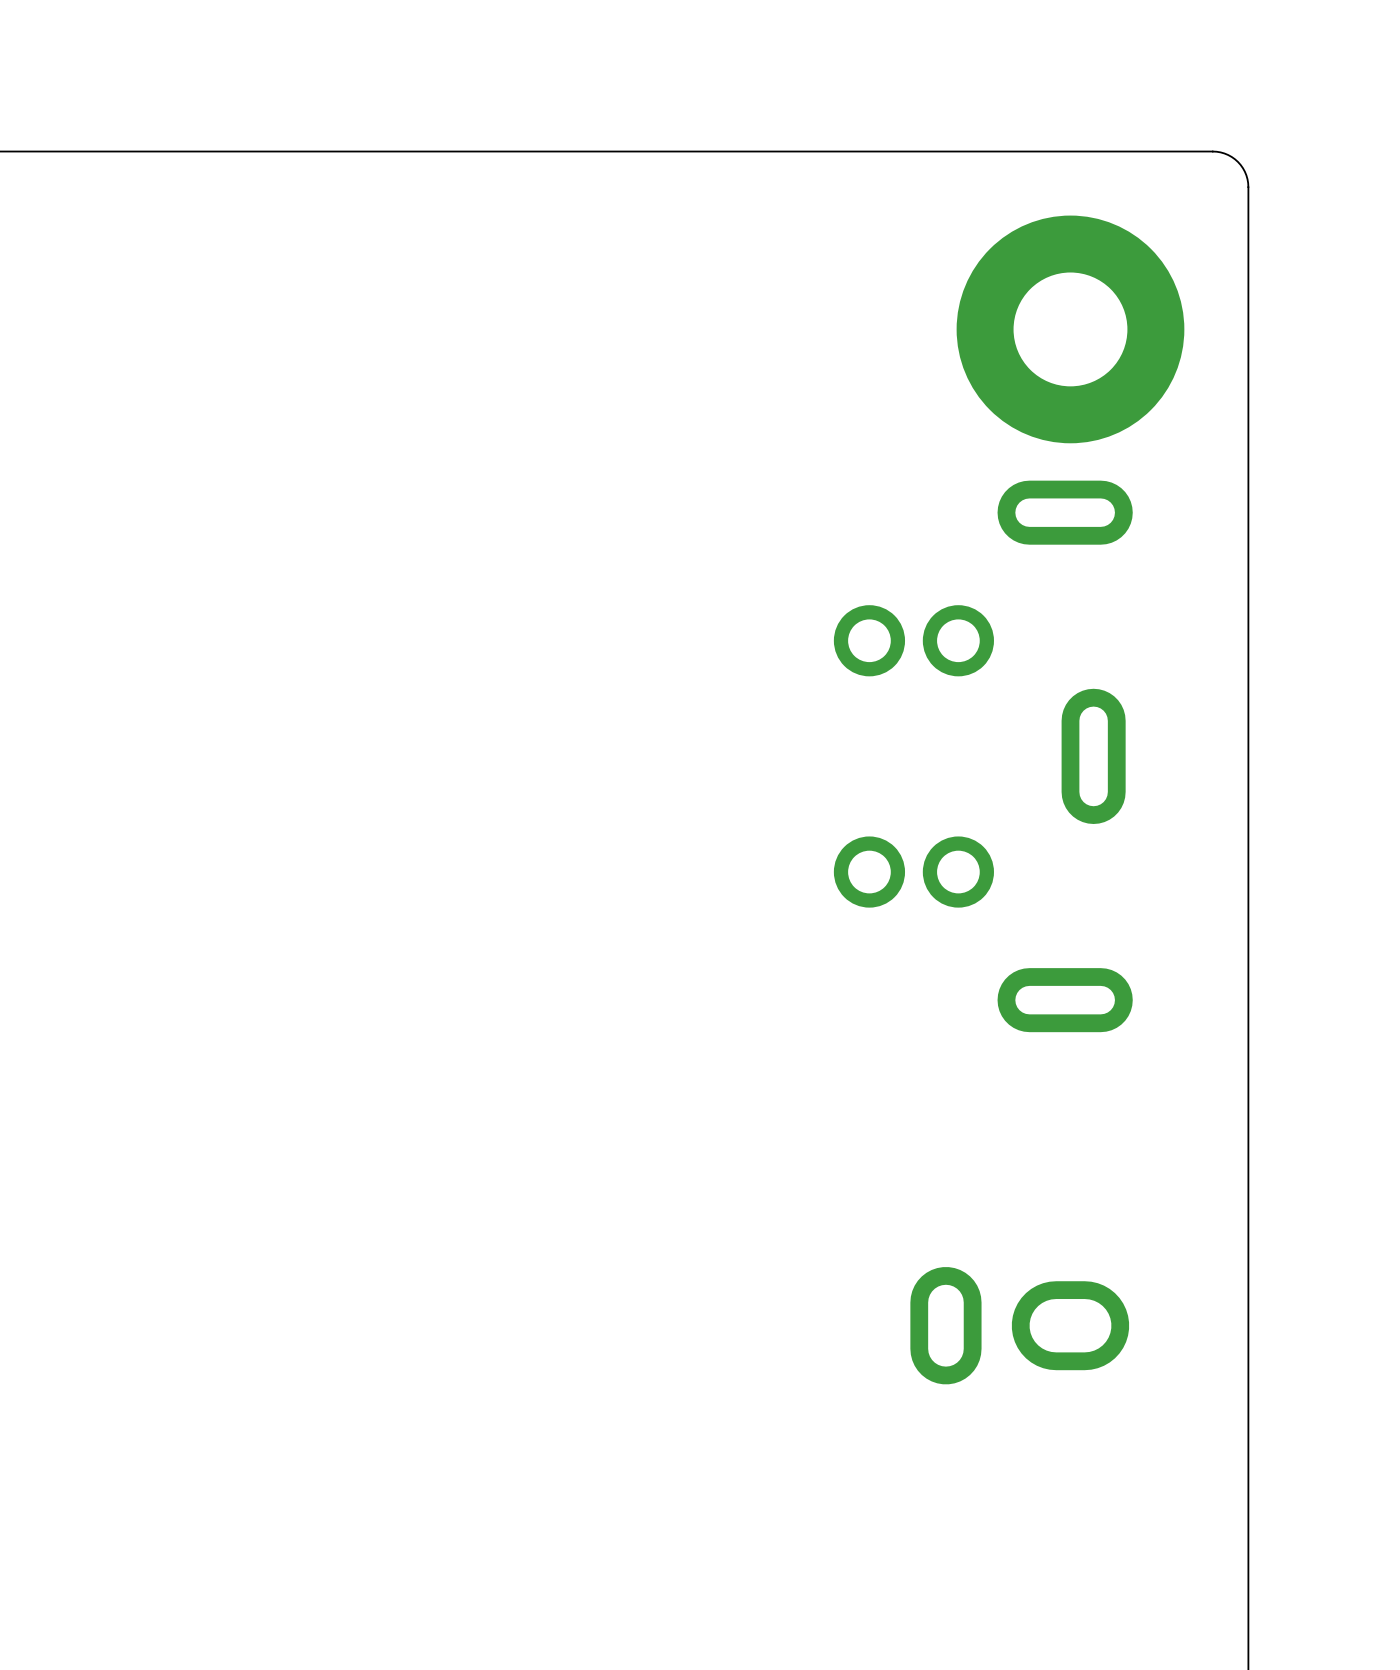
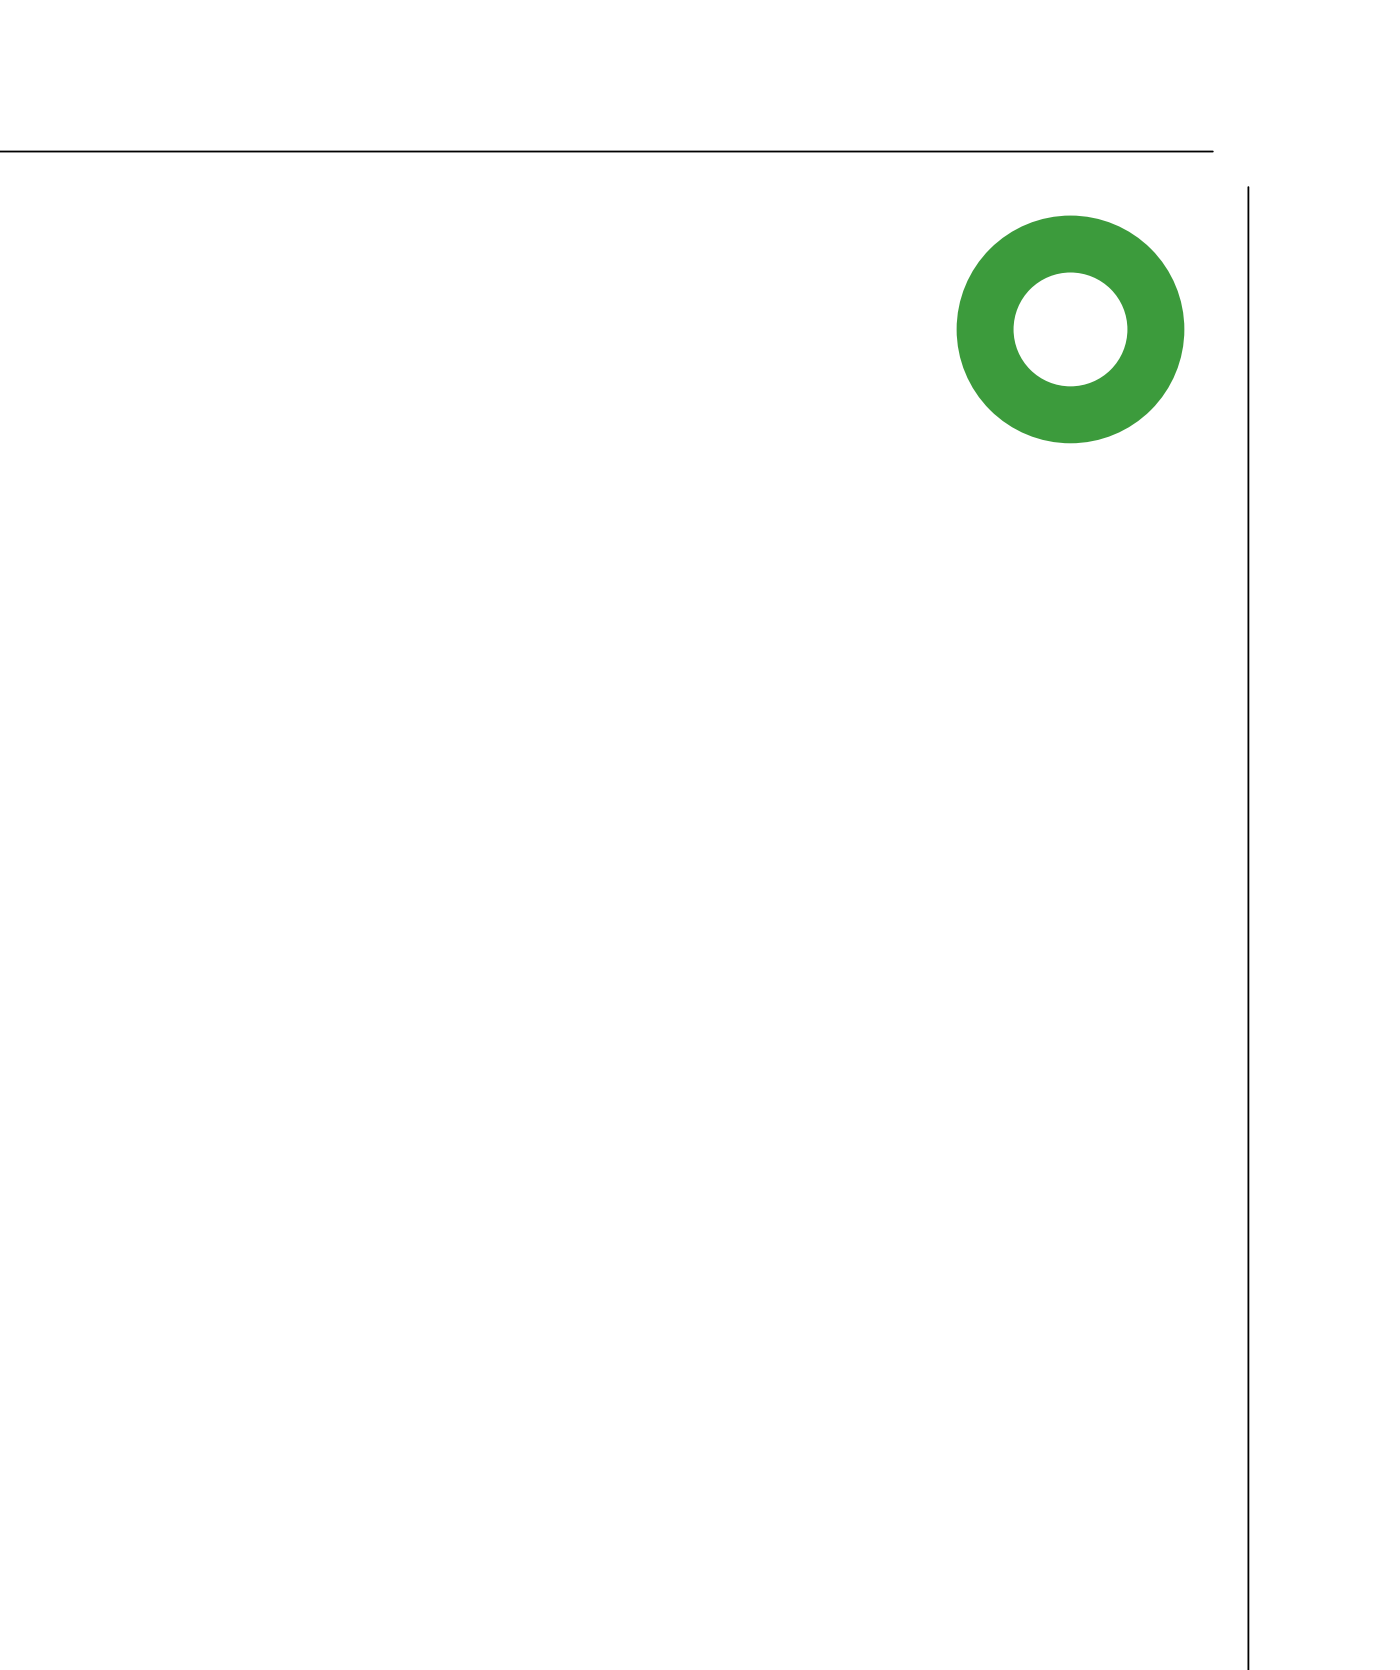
board edge: (1212, 151) (1228, 155) (1237, 161) (1246, 175) (1248, 187) -> none
part: (983, 756) -> none
part: (1019, 1325) -> none

